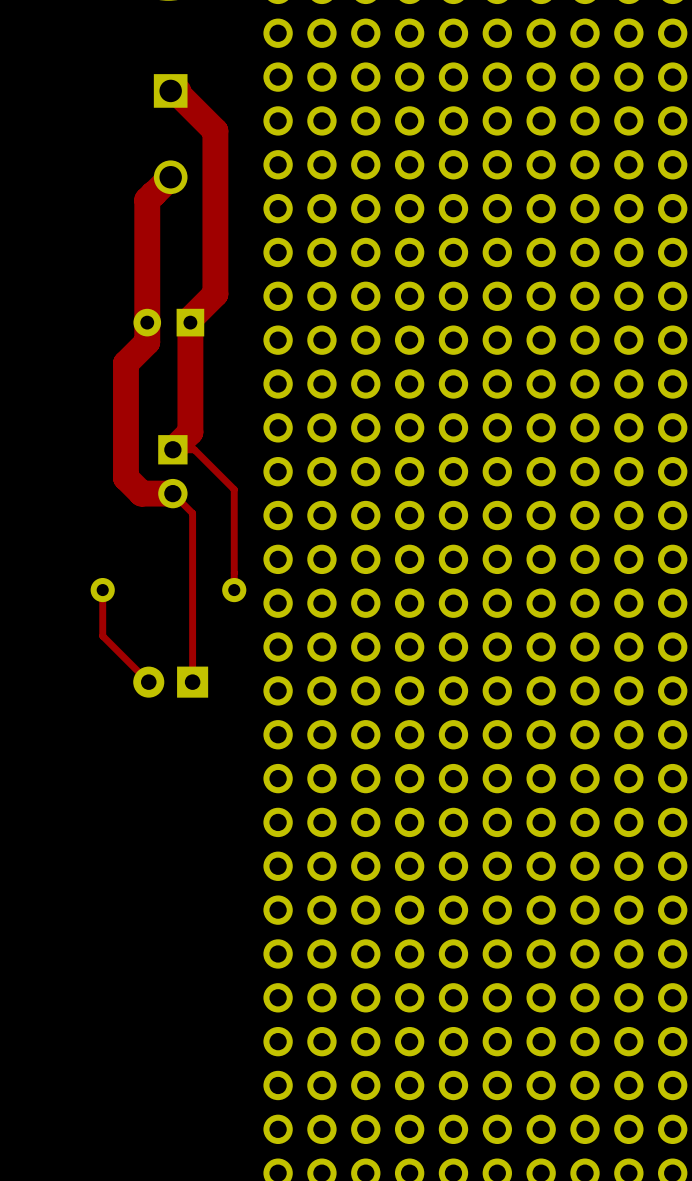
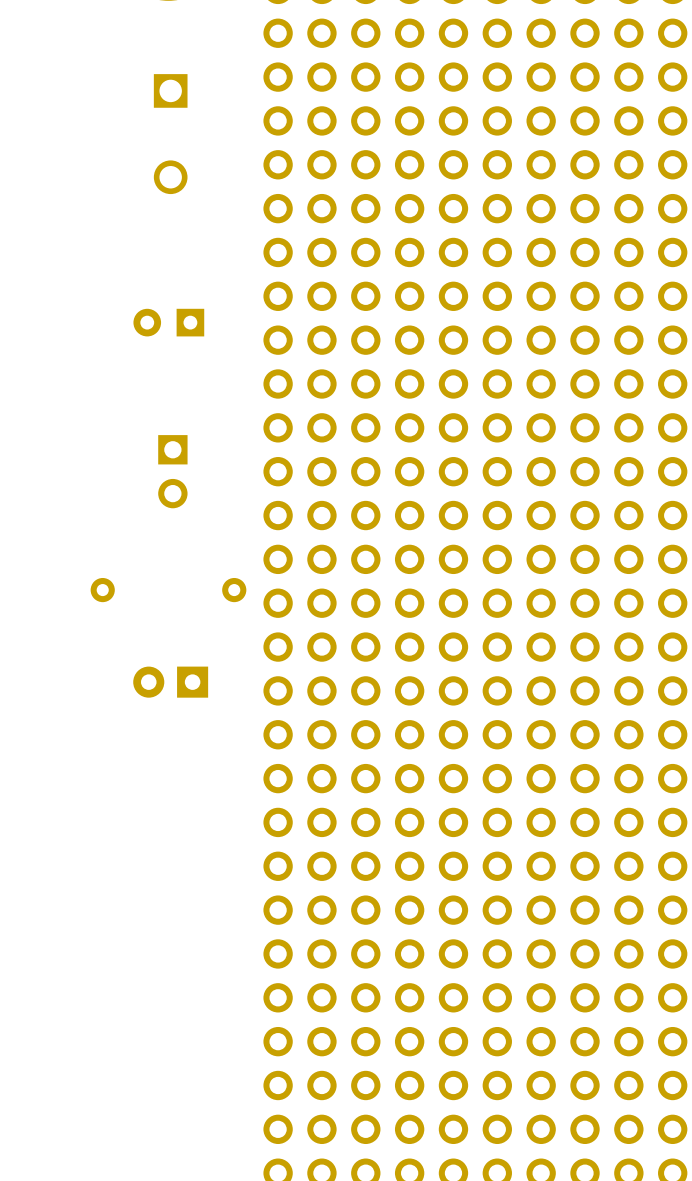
top track: (175, 90) (215, 131) (215, 294) (190, 319) (190, 432) (172, 449) (194, 449) (234, 489) (234, 590) -> none
top track: (170, 177) (147, 200) (147, 342) (125, 363) (125, 477) (141, 493) (172, 493) (192, 513) (192, 682) -> none
top track: (102, 590) (102, 636) (148, 682) -> none

